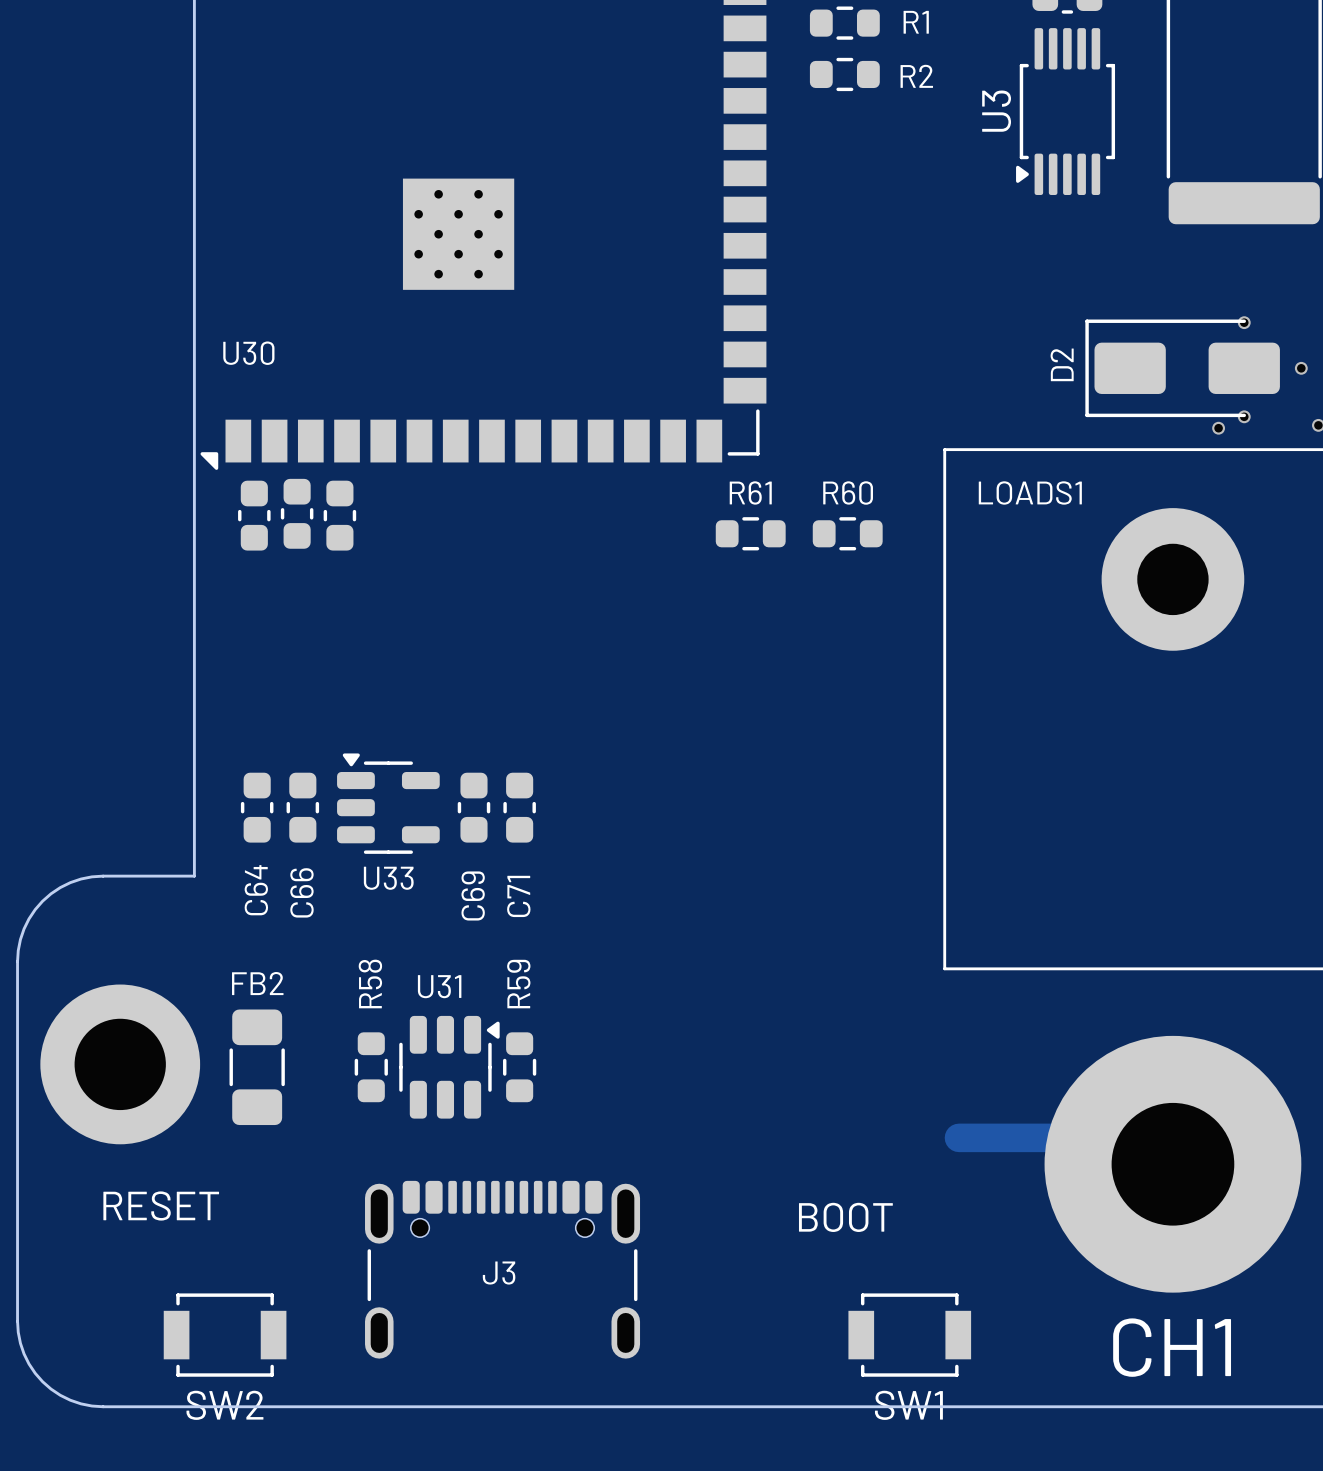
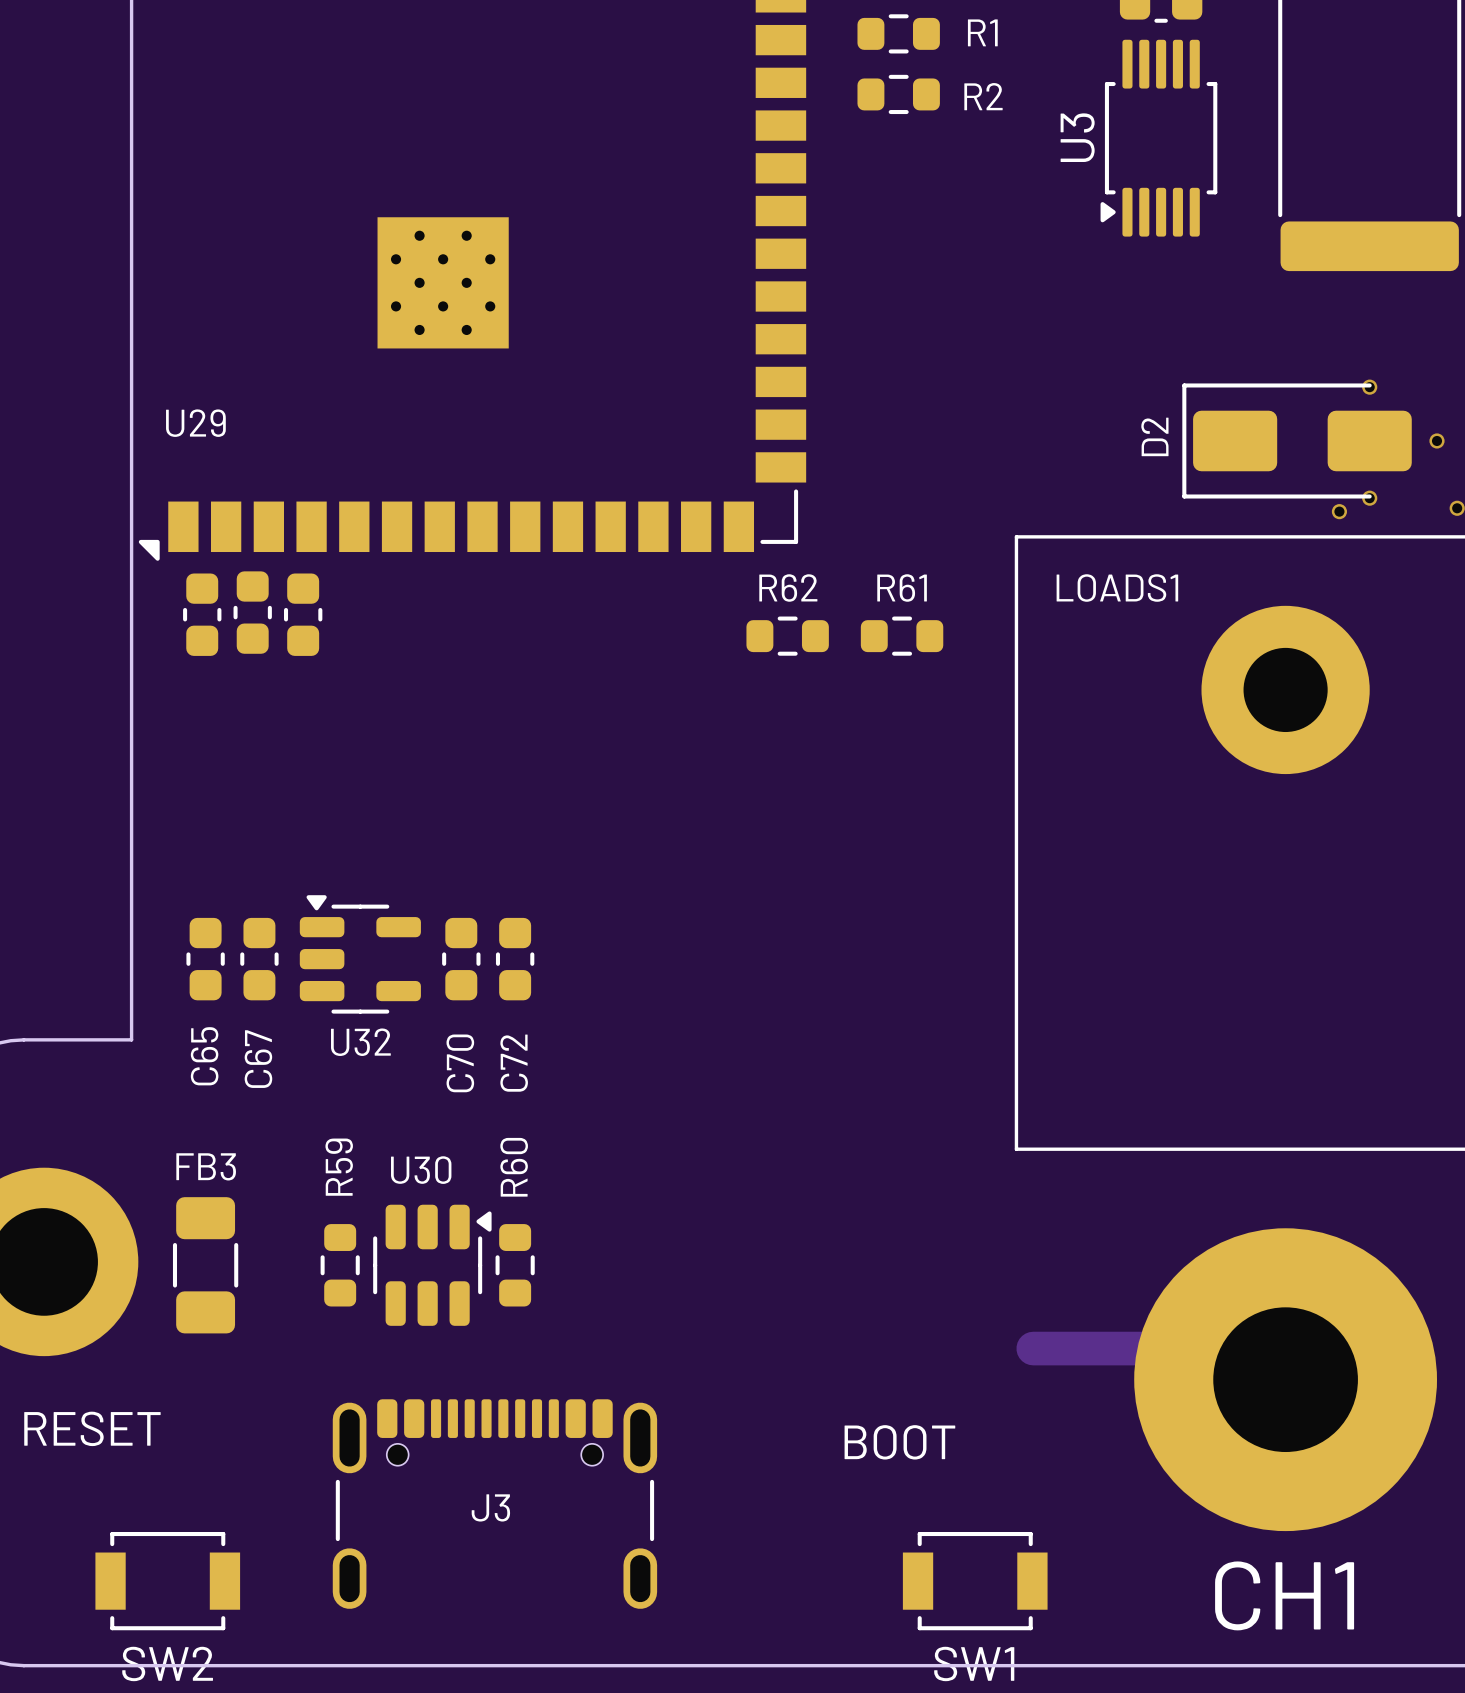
U30 name: U30 (248, 353) -> U29 (195, 423)
R61 name: R61 (750, 492) -> R62 (788, 587)
R60 name: R60 (848, 493) -> R61 (902, 587)
U33 name: U33 (388, 878) -> U32 (360, 1042)
C64 name: C64 (256, 890) -> C65 (204, 1056)
C66 name: C66 (301, 892) -> C67 (258, 1059)
C69 name: C69 (473, 895) -> C70 (460, 1063)
C71 name: C71 (518, 896) -> C72 (514, 1063)
FB2 name: FB2 (257, 983) -> FB3 (206, 1166)
R58 name: R58 (370, 983) -> R59 (339, 1167)
R59 name: R59 (518, 984) -> R60 (514, 1167)
U31 name: U31 (439, 986) -> U30 (421, 1170)

